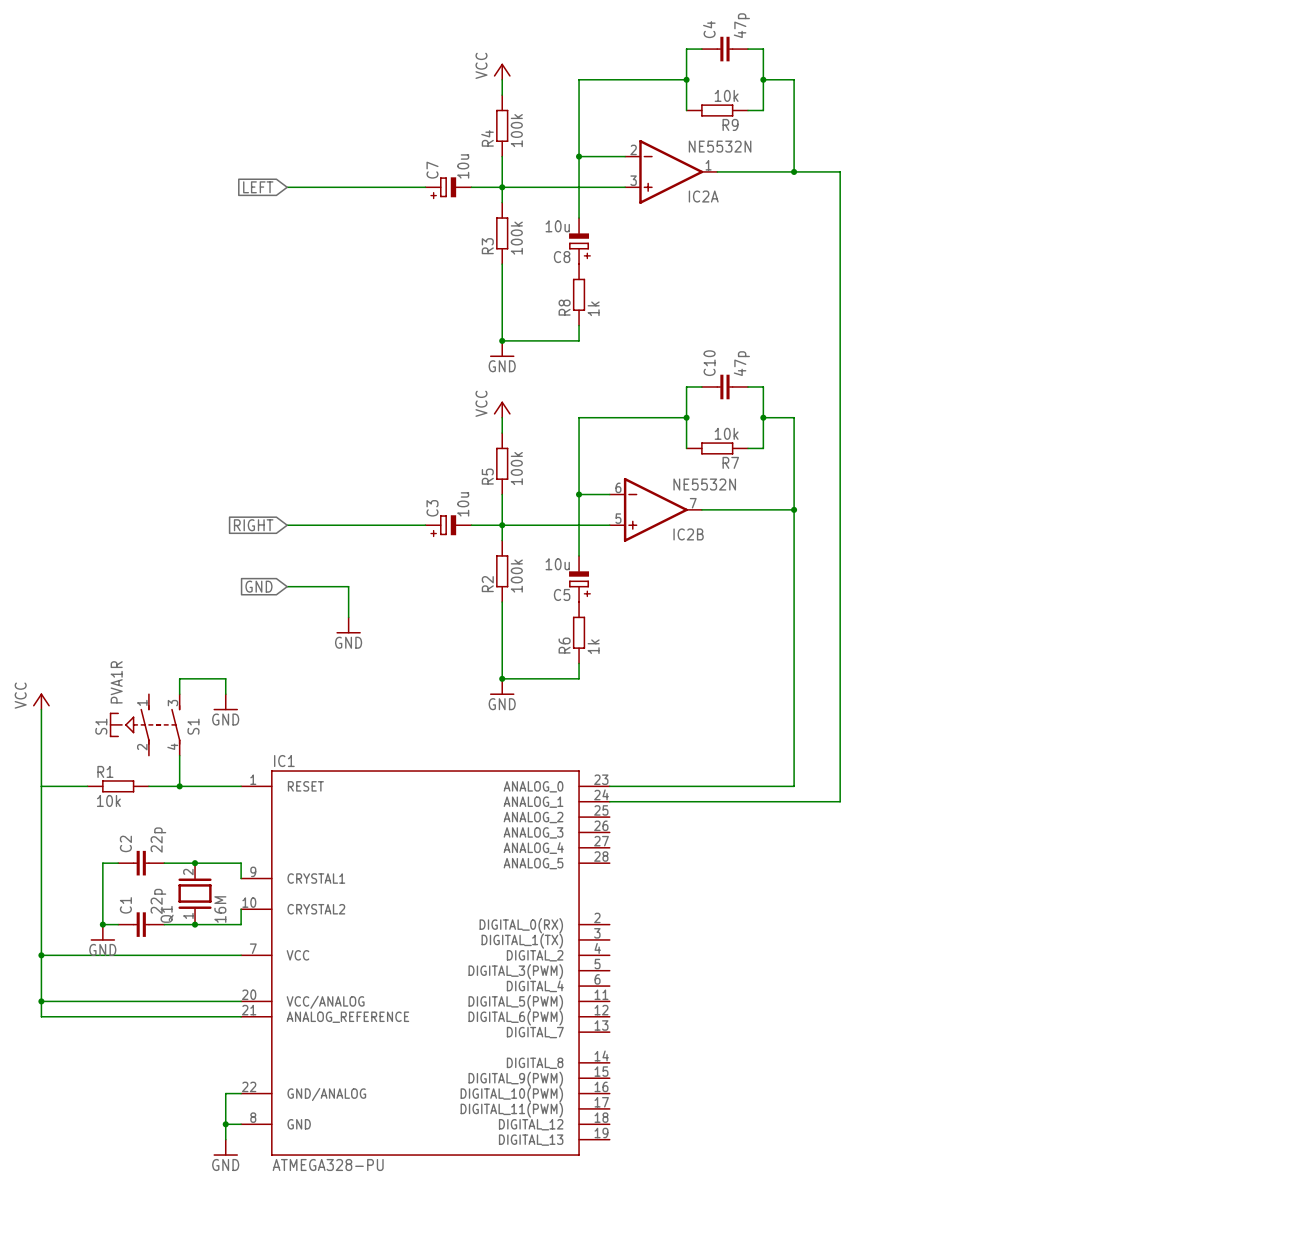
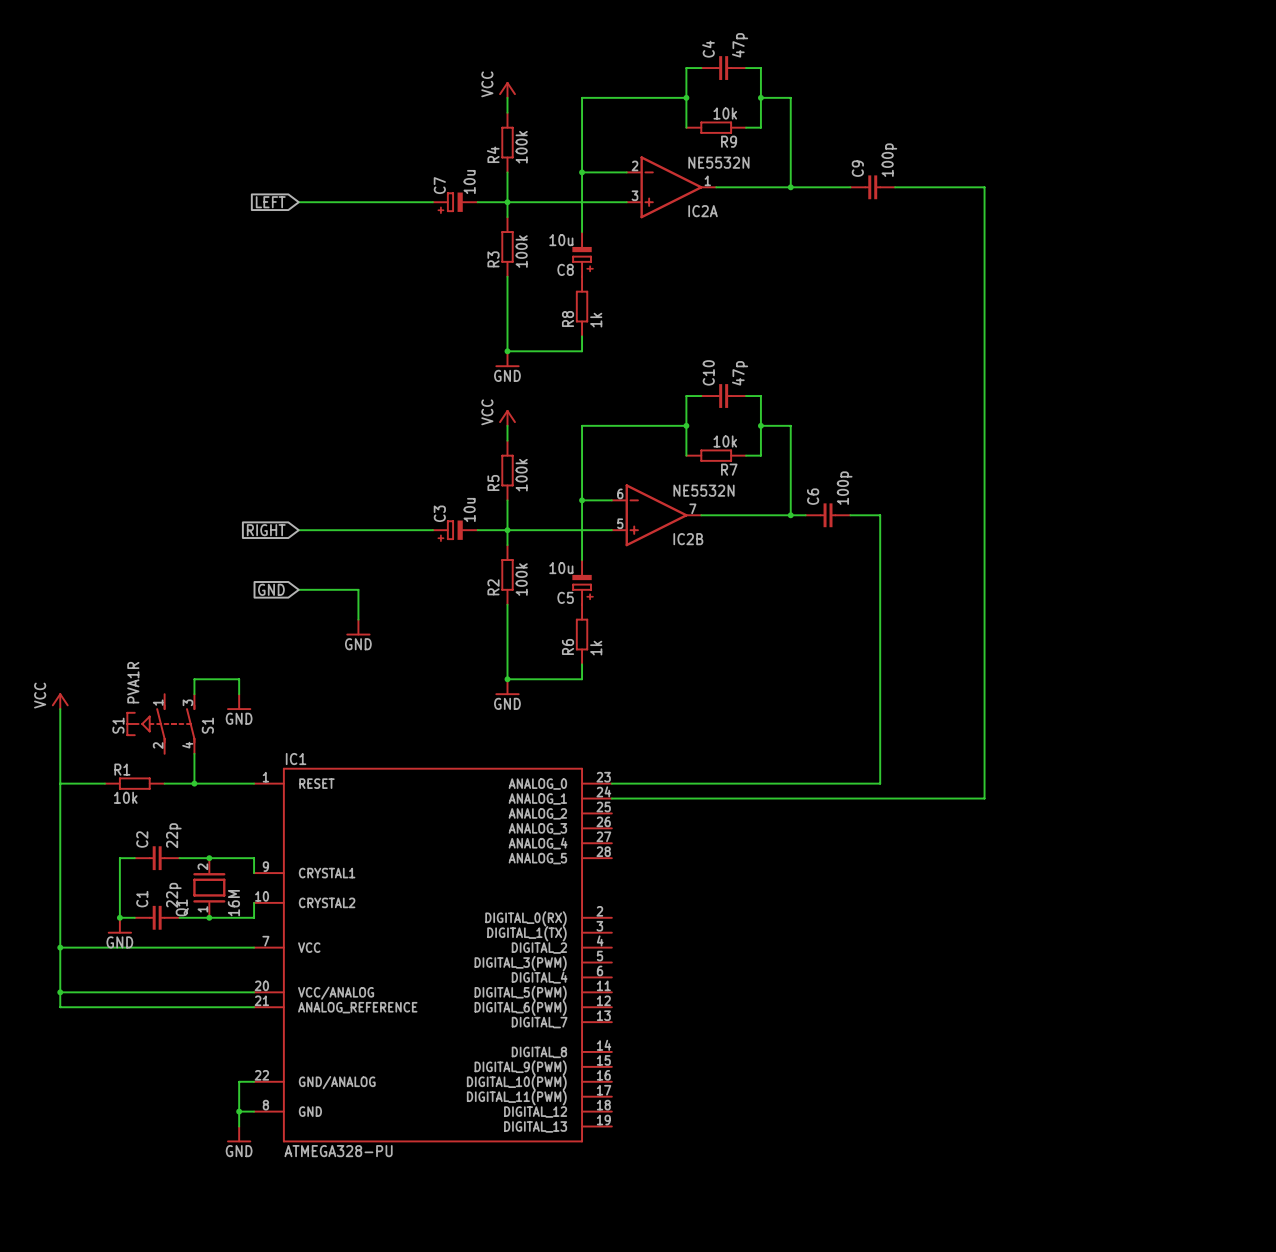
wire: (840, 171) (840, 801) -> (895, 187) (984, 187) (984, 798) (835, 798)
wire: none -> (835, 187) (850, 187)
C9: none -> 100p (872, 187)
wire: (794, 509) (794, 786) -> (850, 515) (880, 515) (880, 783) (790, 783)
wire: none -> (790, 515) (805, 515)
C6: none -> 100p (828, 515)

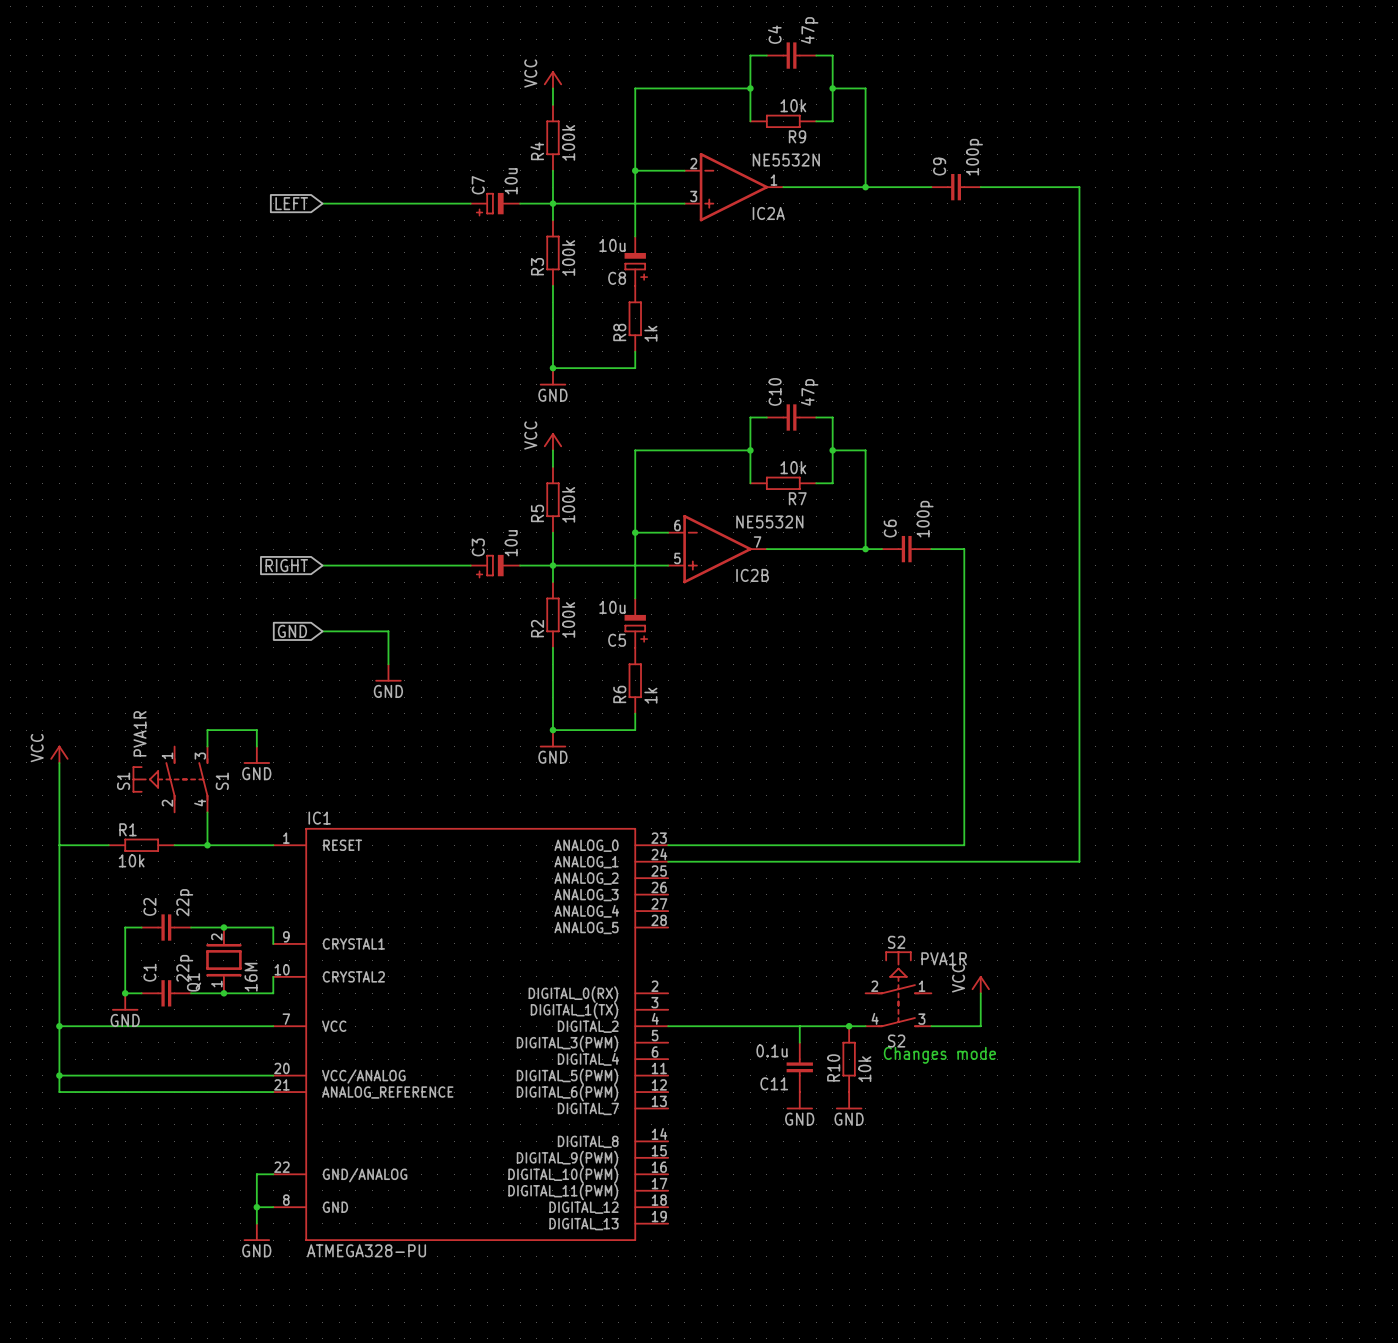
S2: none -> PVA1R (898, 978)
power symbol: none -> VCC (980, 984)
wire: none -> (980, 993) (980, 1026) (931, 1026)
S2: none -> (898, 1014)
wire: none -> (668, 1026) (865, 1026)
wire: none -> (799, 1026) (799, 1042)
junction: none -> (849, 1026)
text: none -> Changes mode (939, 1055)
R10: none -> 10k (849, 1059)
C11: none -> 0.1u (799, 1067)
power symbol: none -> GND (799, 1100)
power symbol: none -> GND (849, 1100)

